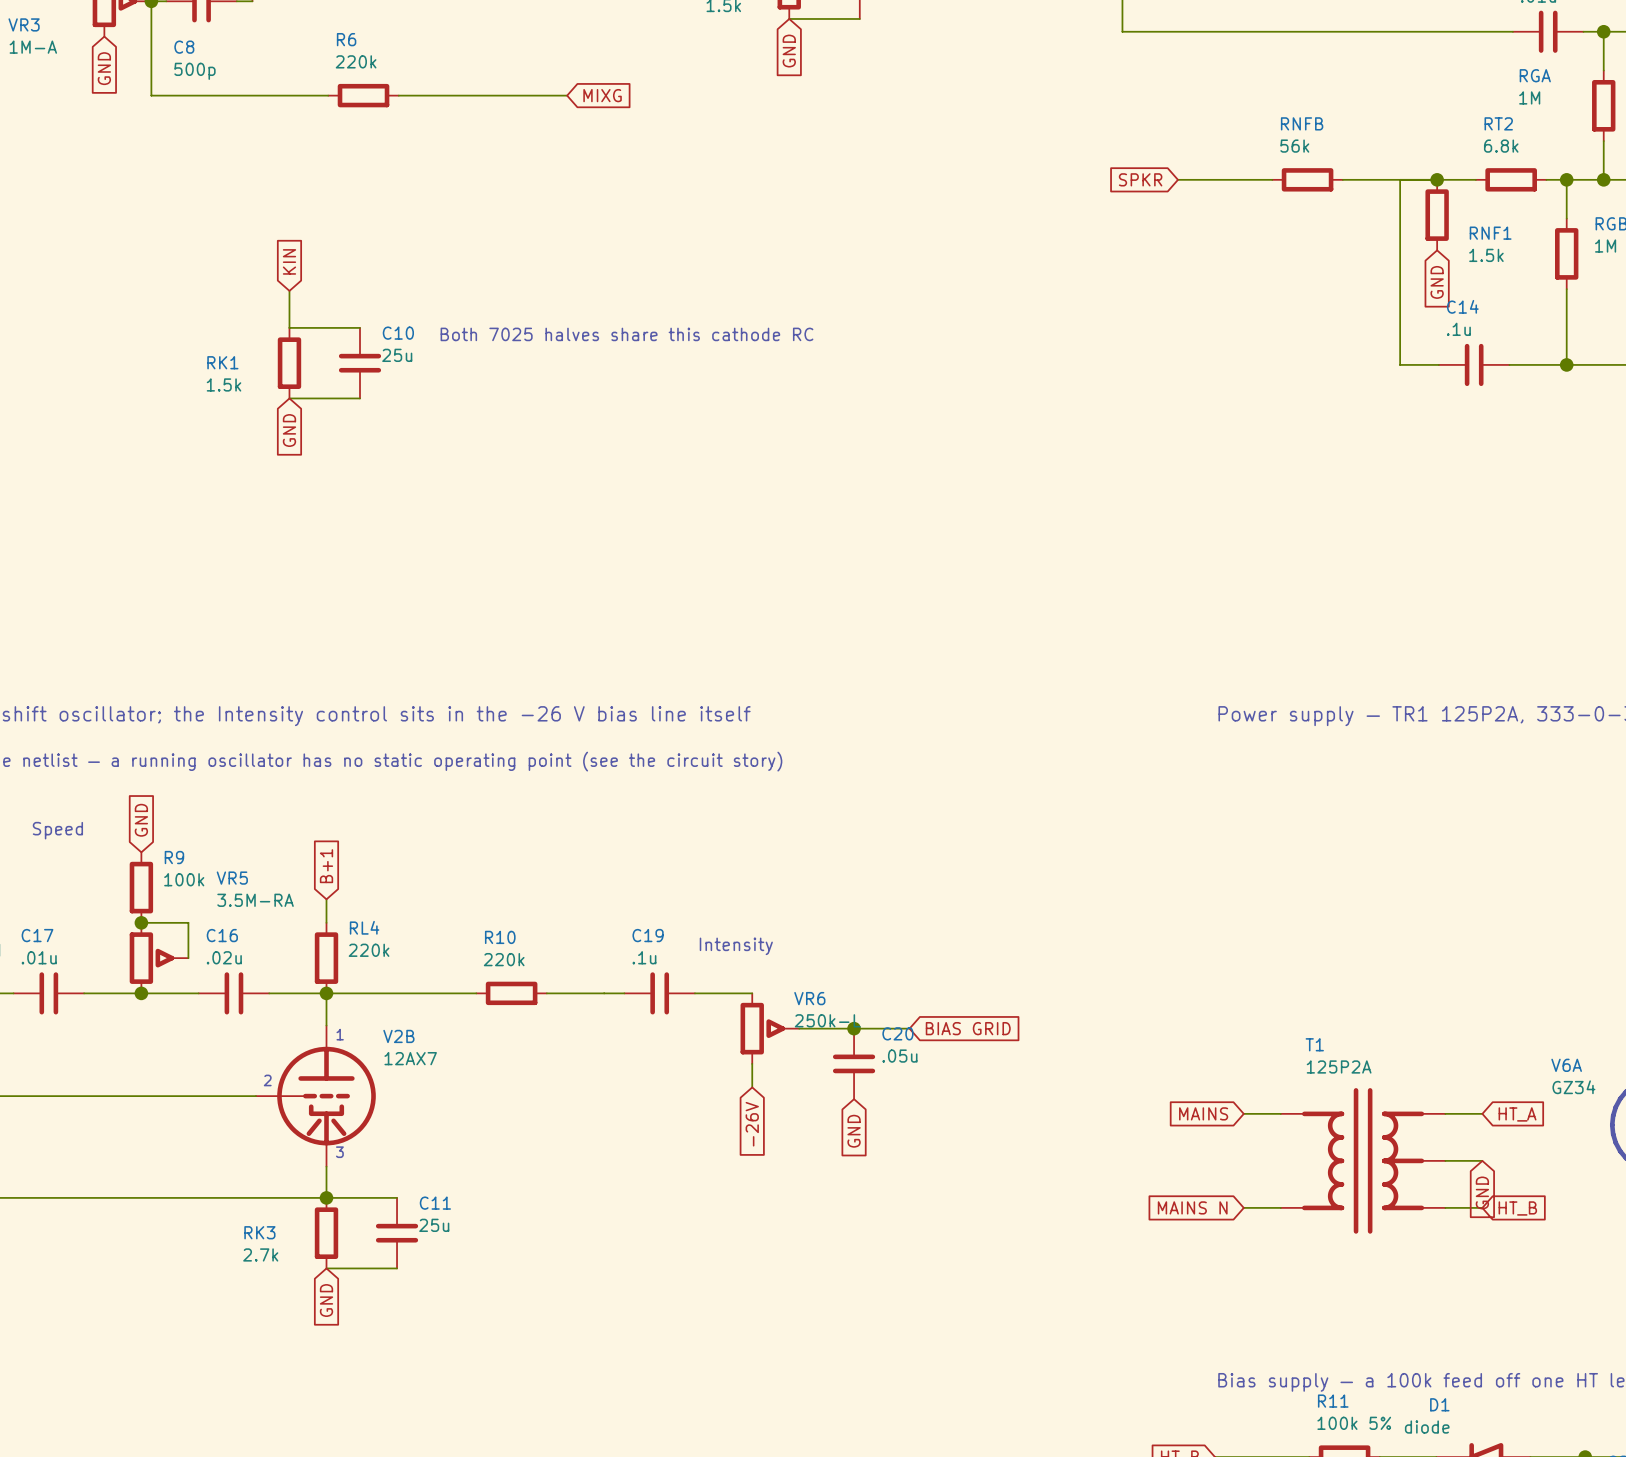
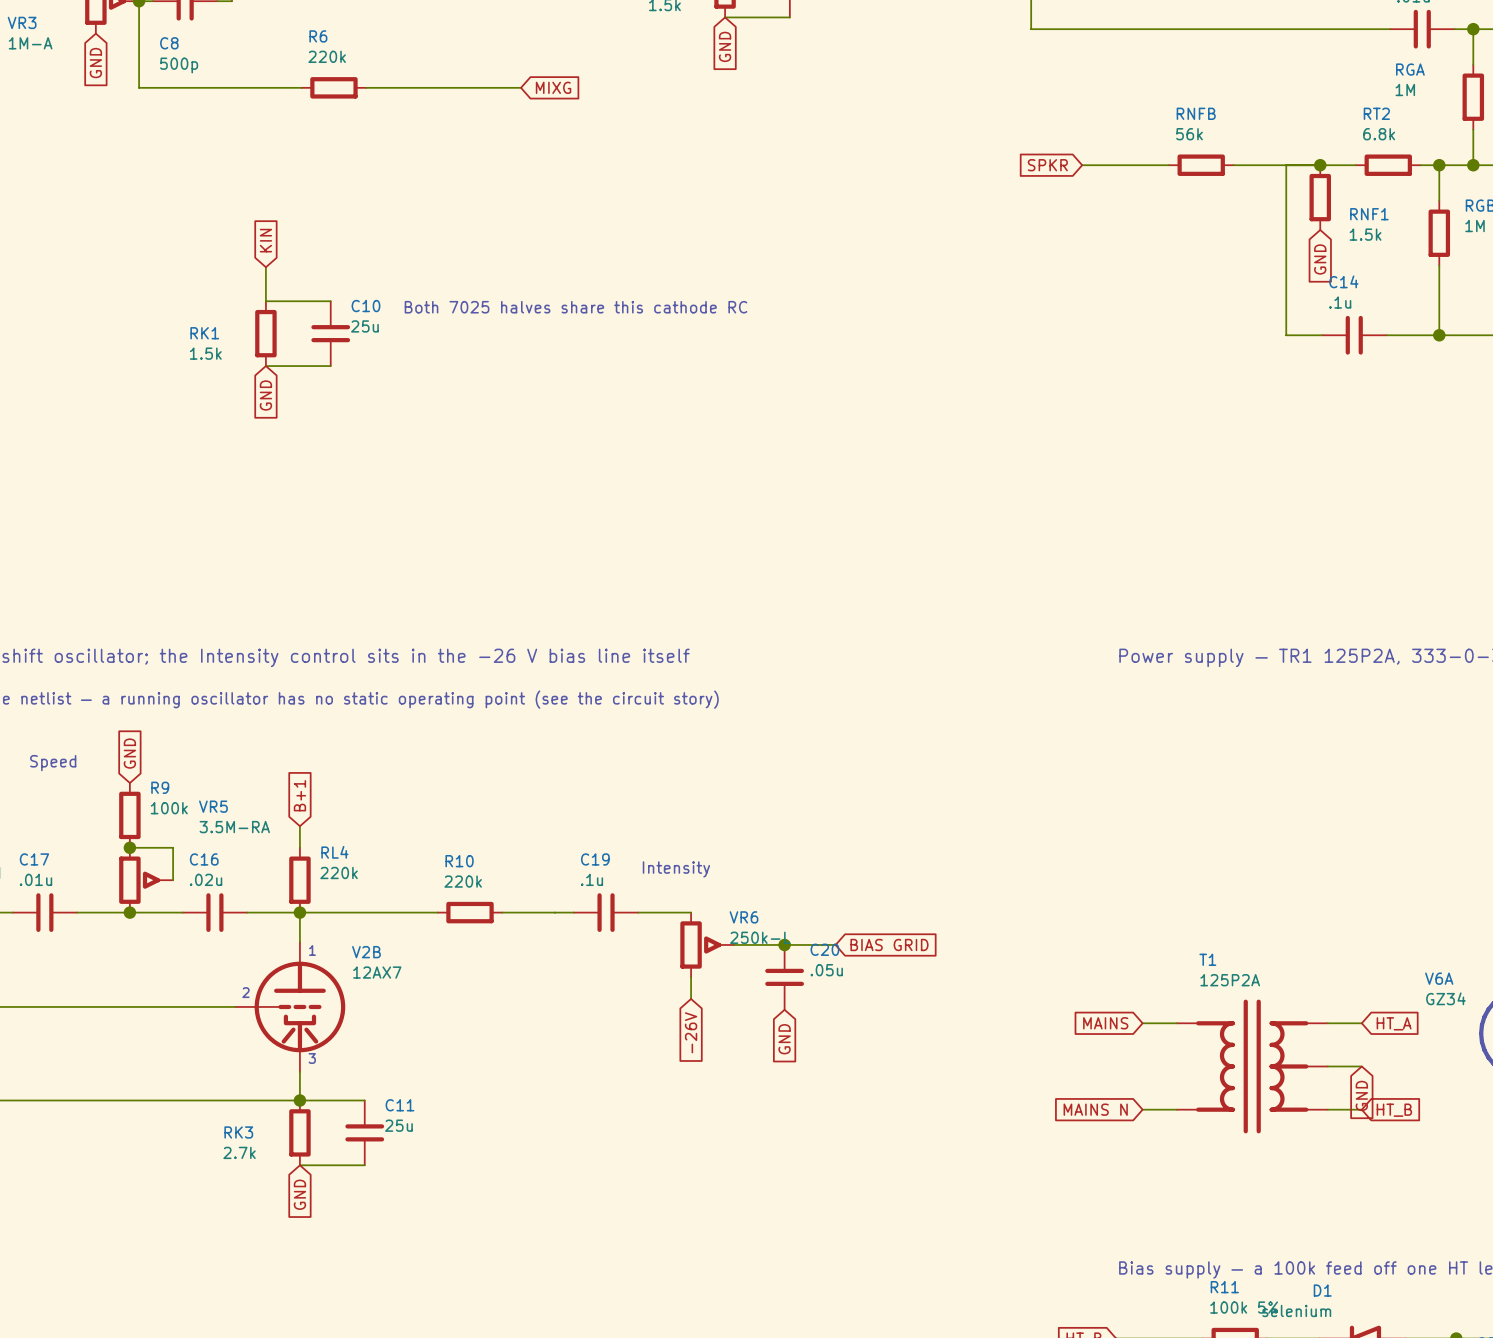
D1 value: diode (1427, 1427) -> selenium (1296, 1310)

